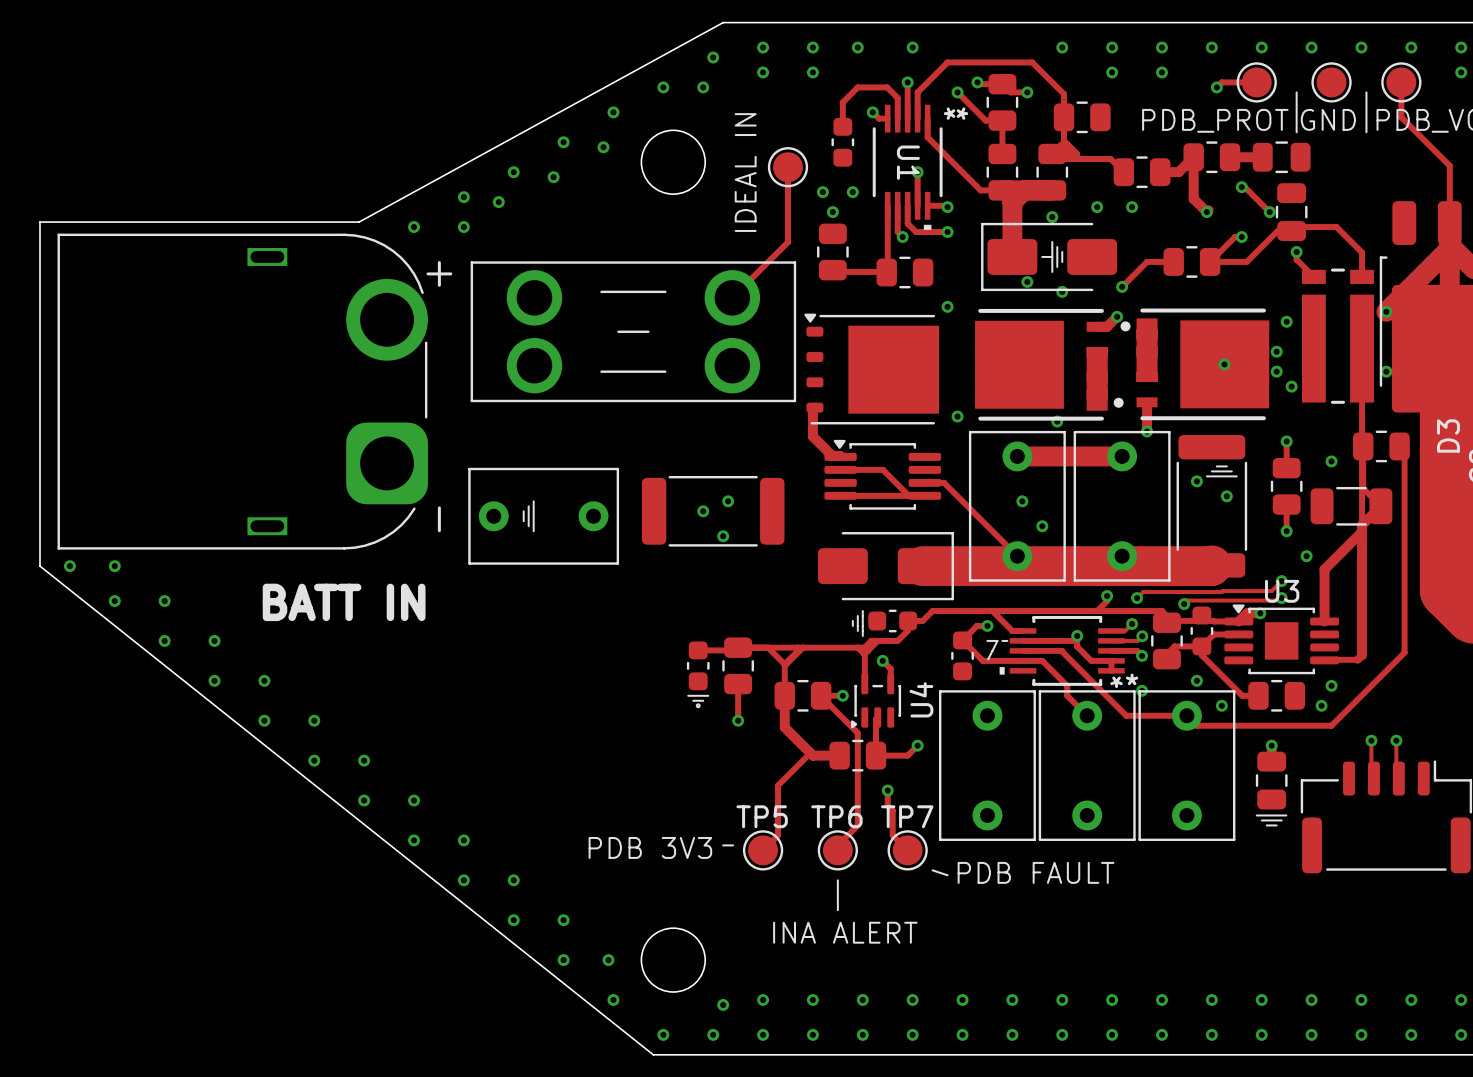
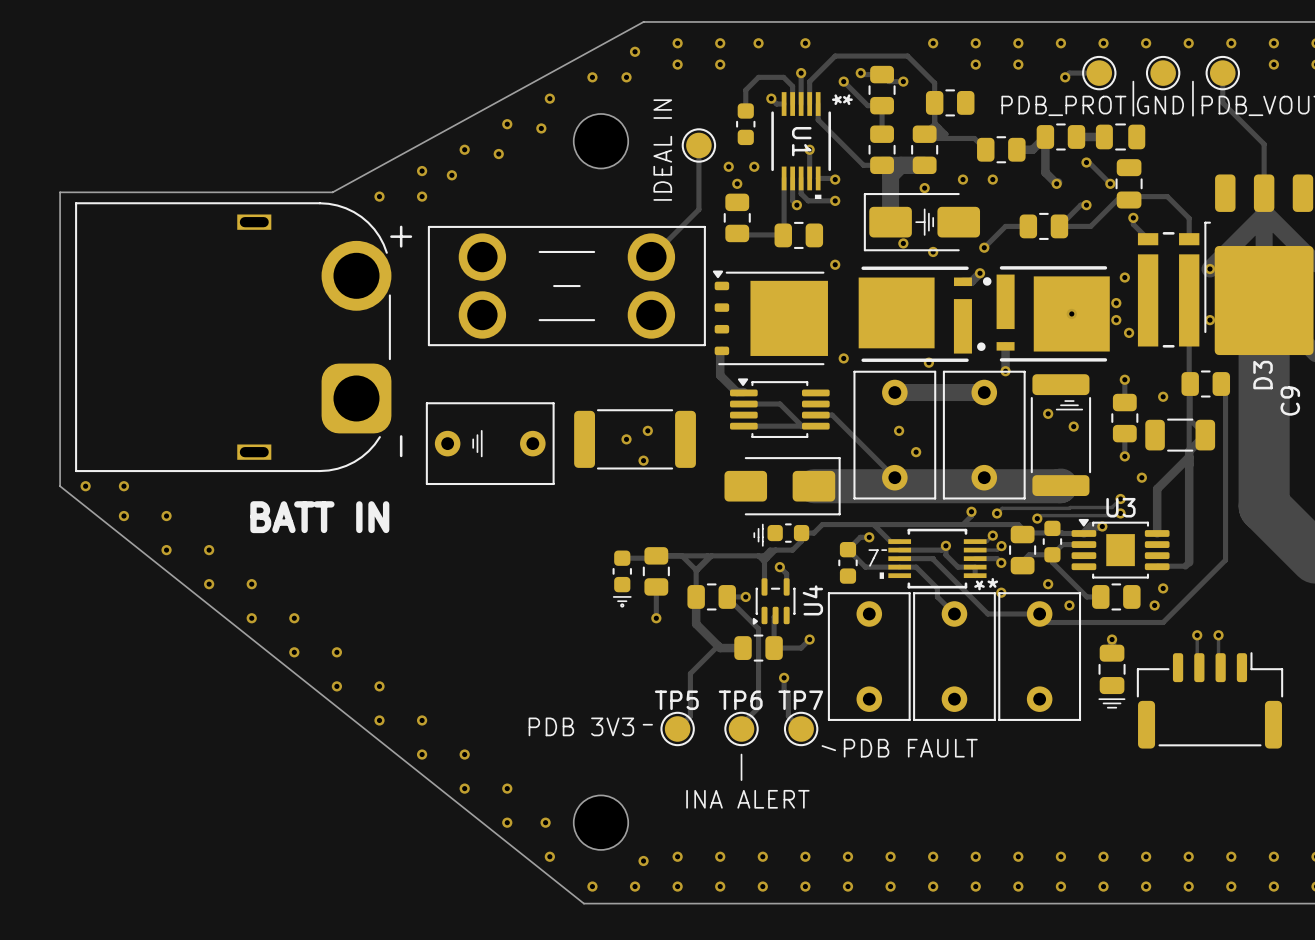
part footprint: [975, 308, 1124, 421] -> [858, 266, 986, 362]
part footprint: [1120, 308, 1270, 421] -> [982, 266, 1110, 362]

